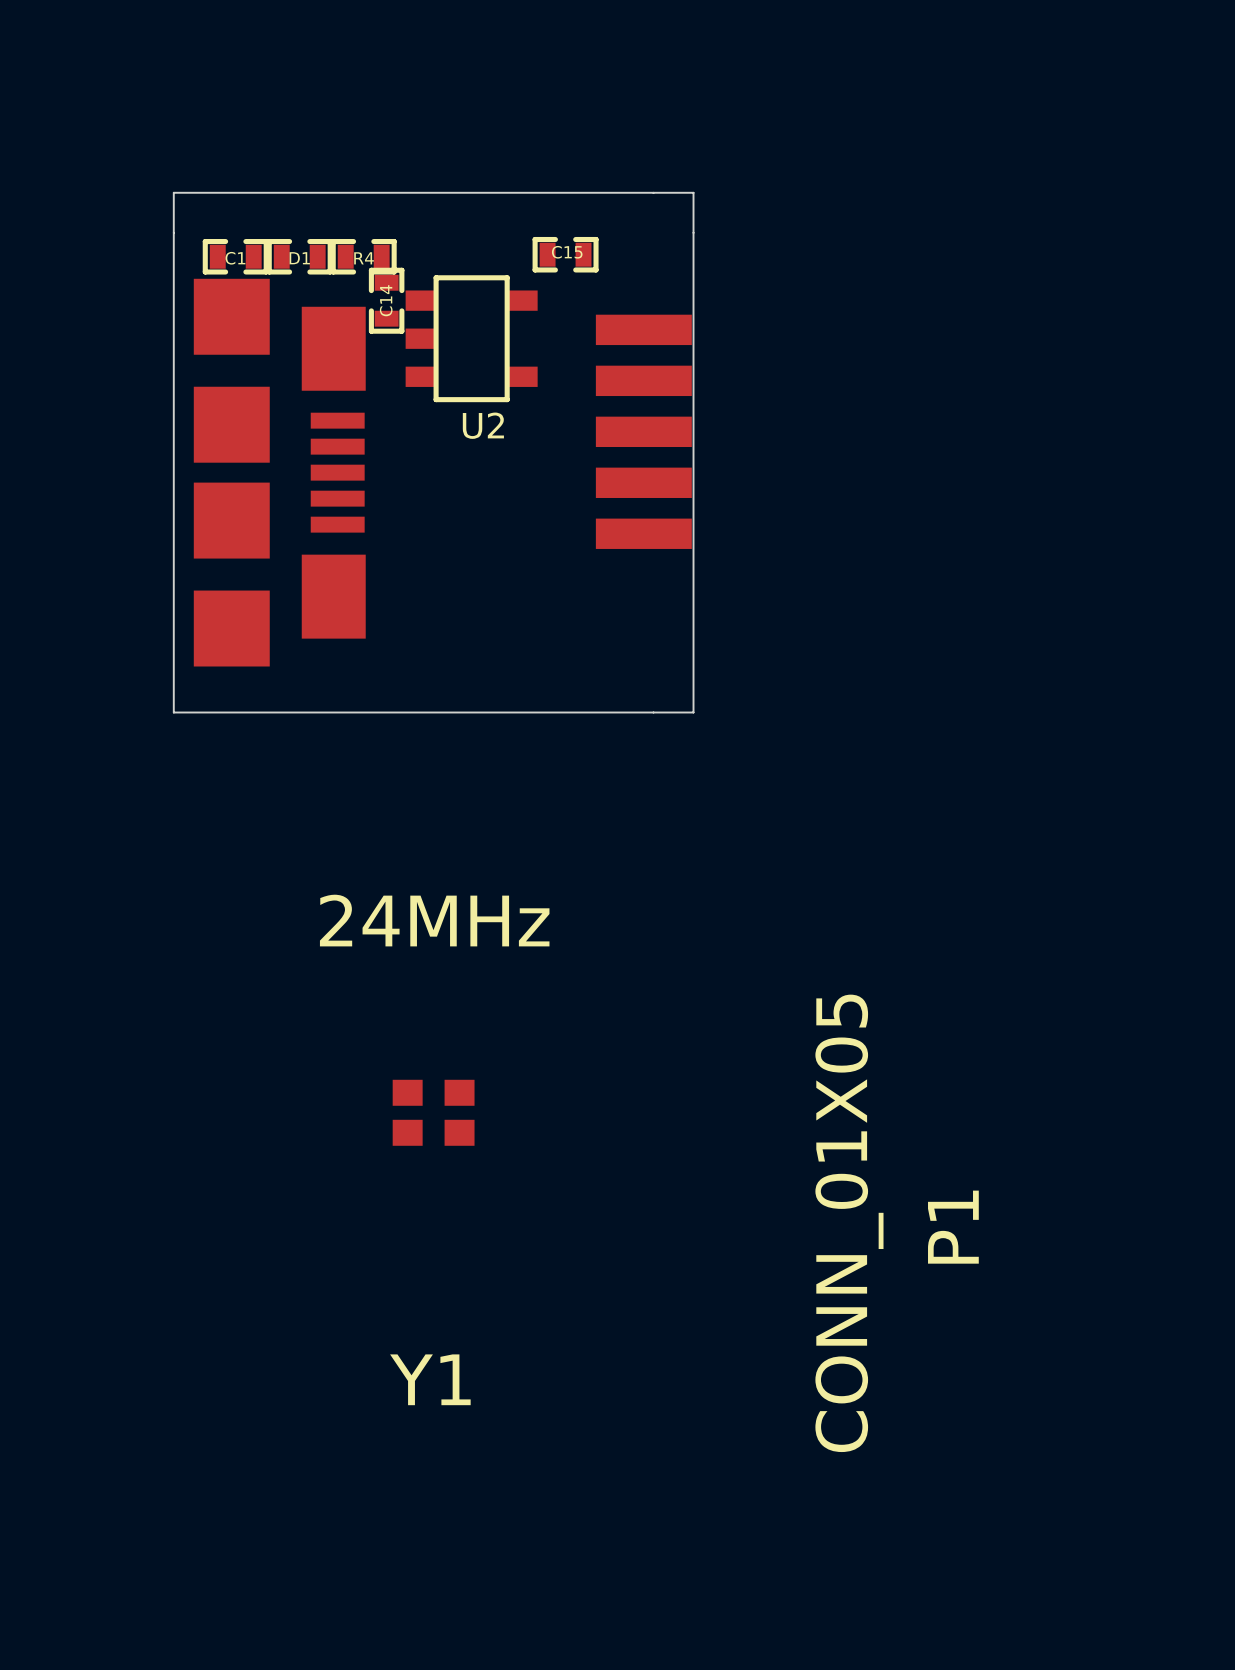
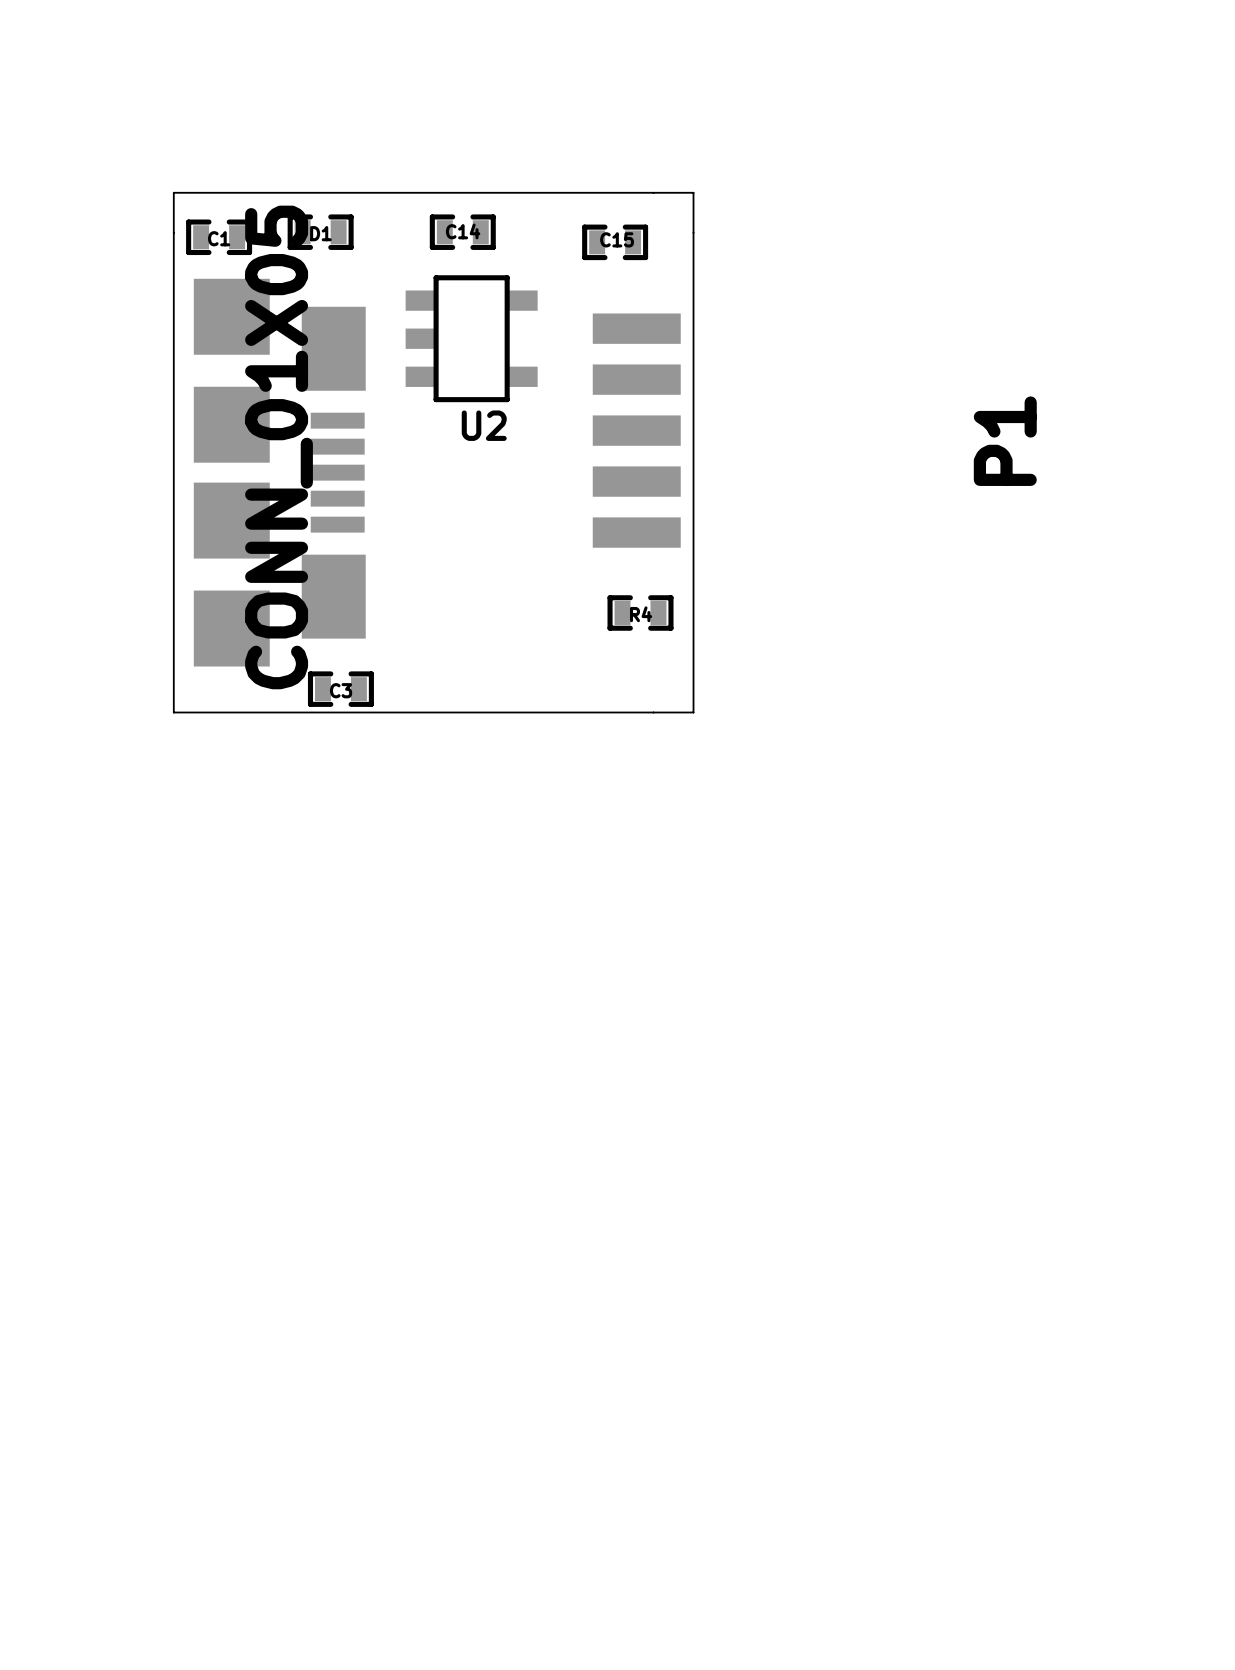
C15 position: (565, 254) -> (615, 242)
C1 position: (235, 256) -> (219, 237)
D1 position: (299, 256) -> (320, 232)
R4 position: (363, 256) -> (640, 612)
C14 rotation: 0° (386, 300) -> 90° clockwise (462, 232)
C14 position: (386, 300) -> (462, 232)
P1 footprint: [595, 314, 692, 549] -> [592, 313, 681, 548]
C3: none -> (340, 689)
Y1: 24MHz (433, 1112) -> none
P1 value position: CONN_01X05 (849, 1223) -> CONN_01X05 (279, 447)
P1 name position: P1 (953, 1227) -> P1 (1005, 441)

